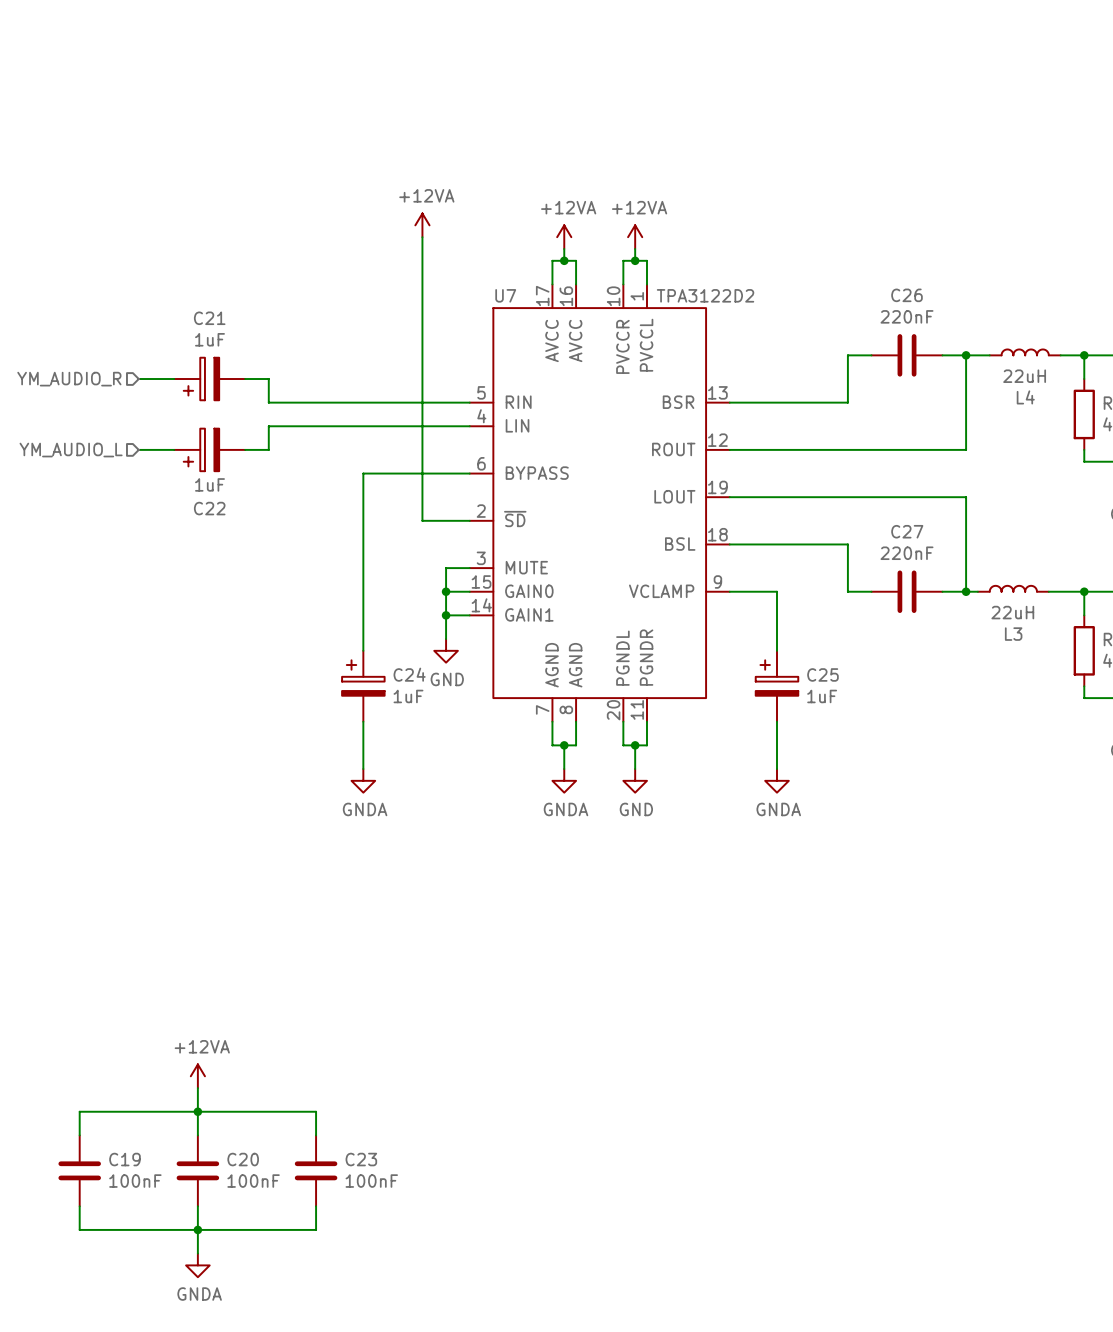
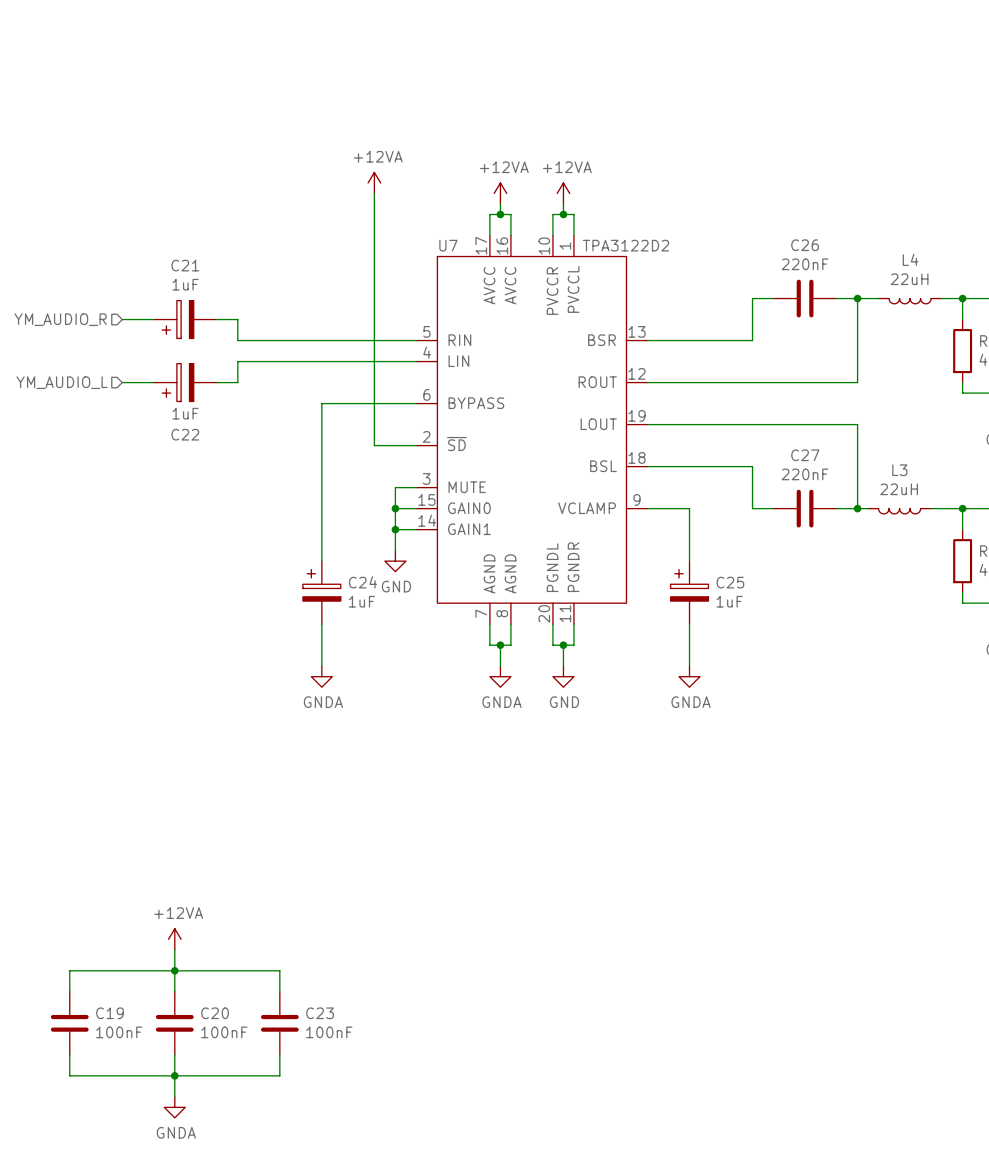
L4 rotation: 0° (1025, 352) -> 180° (910, 301)
L3 rotation: 0° (1013, 588) -> 180° (899, 511)

